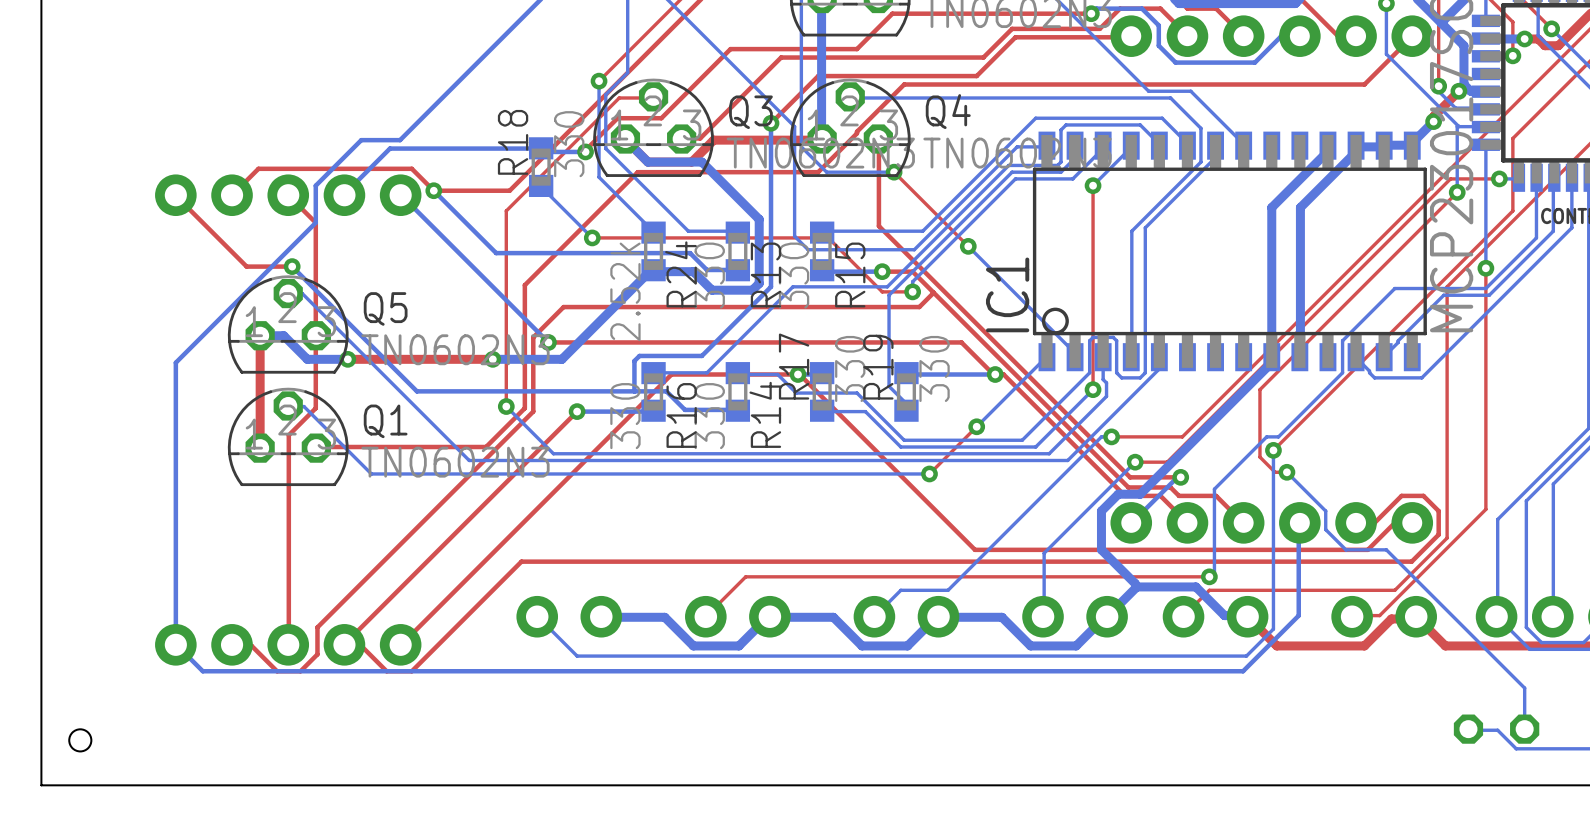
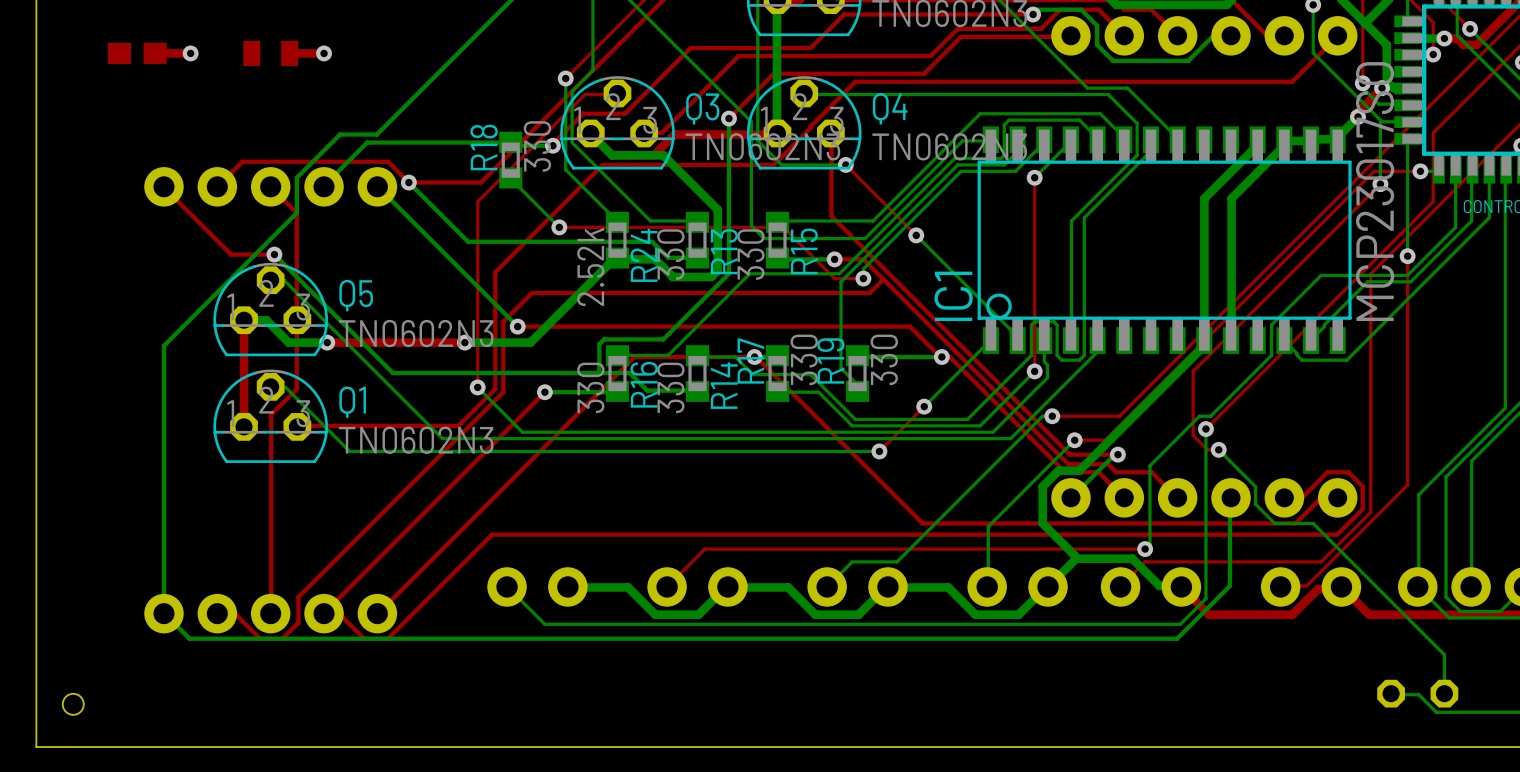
part: none -> (137, 53)
top track: none -> (190, 53) (155, 53)
via: none -> (190, 53)
part: none -> (270, 53)
top track: none -> (324, 53) (289, 53)
via: none -> (324, 53)

